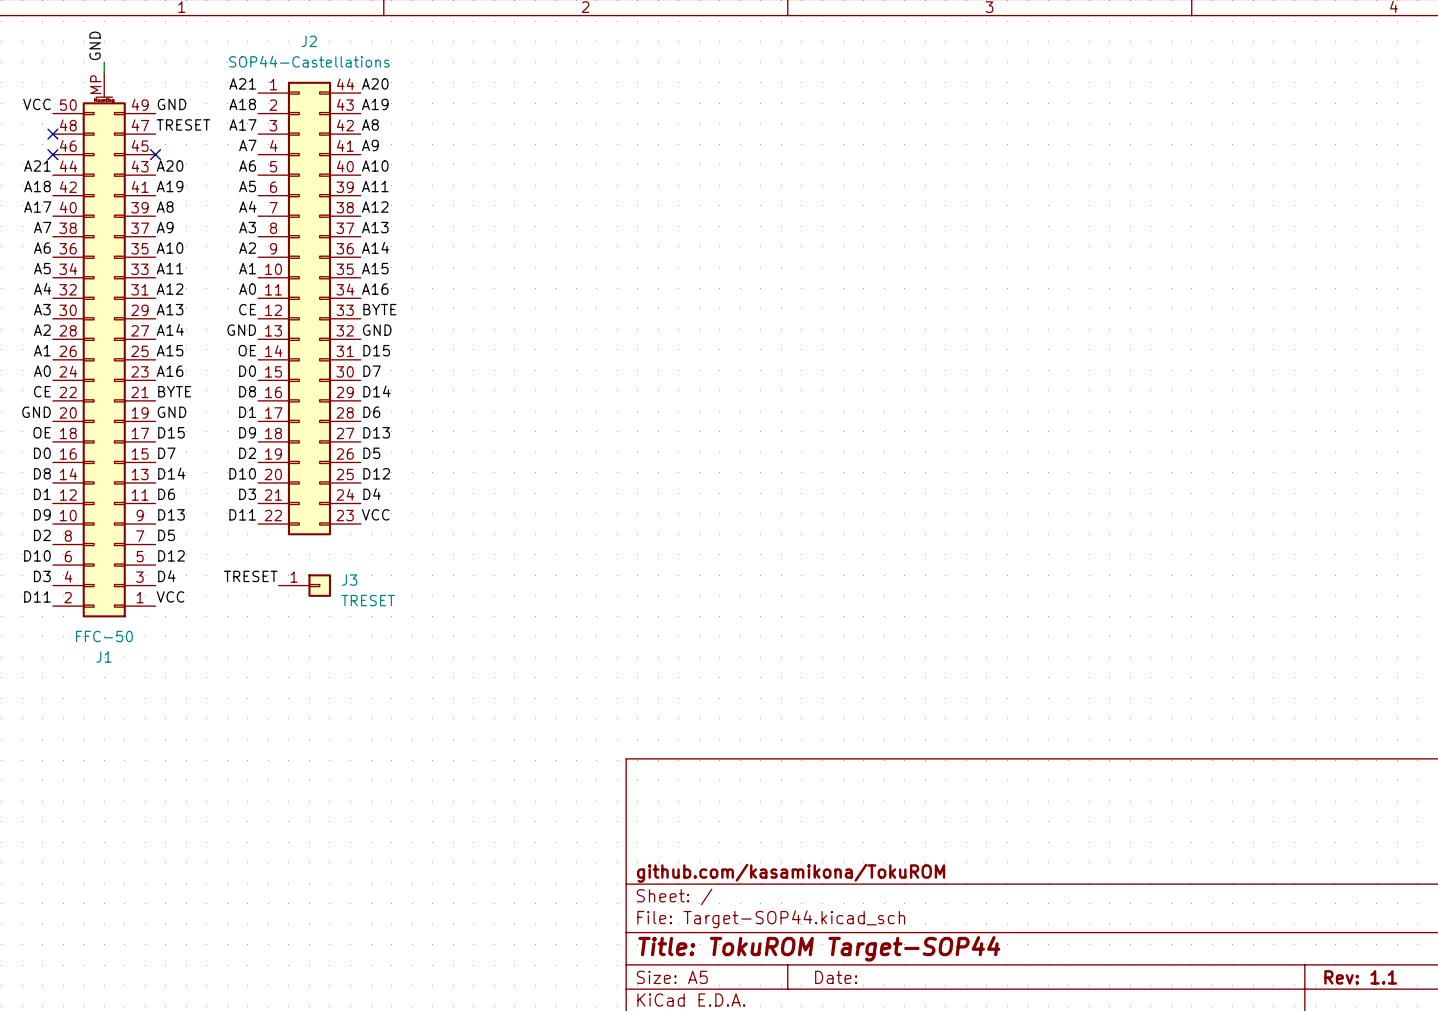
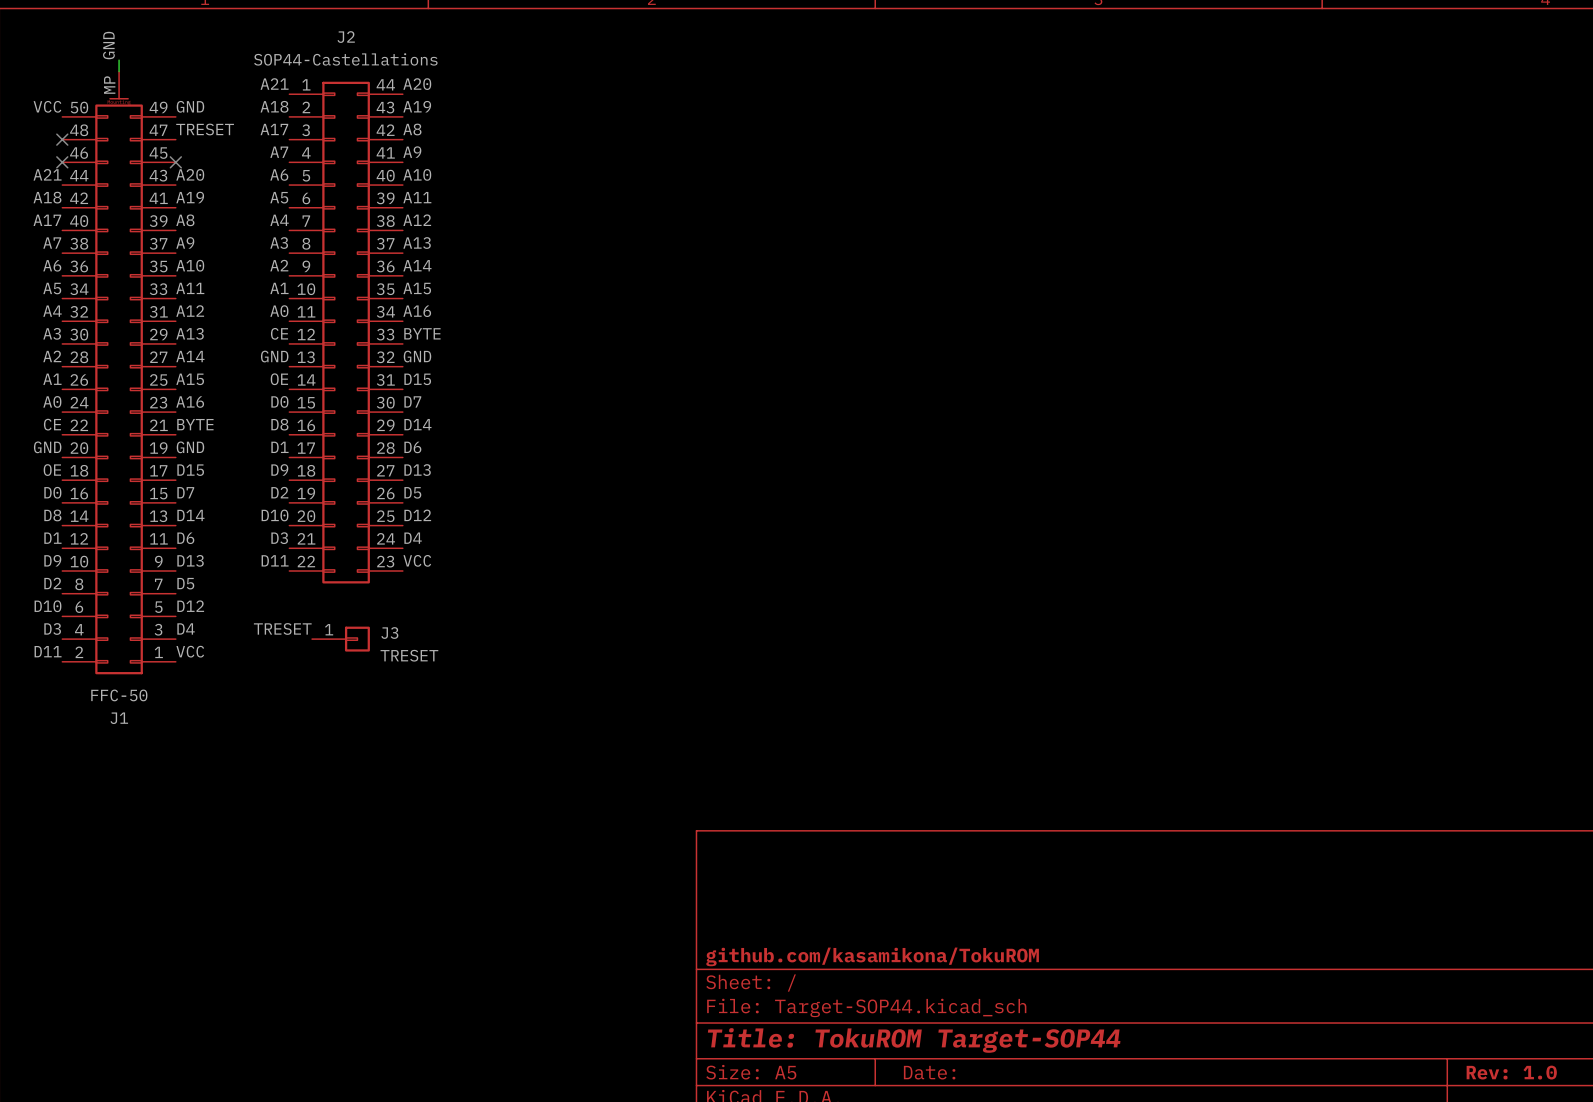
title block: Rev: 1.1 (1360, 977) -> Rev: 1.0 (1511, 1072)

